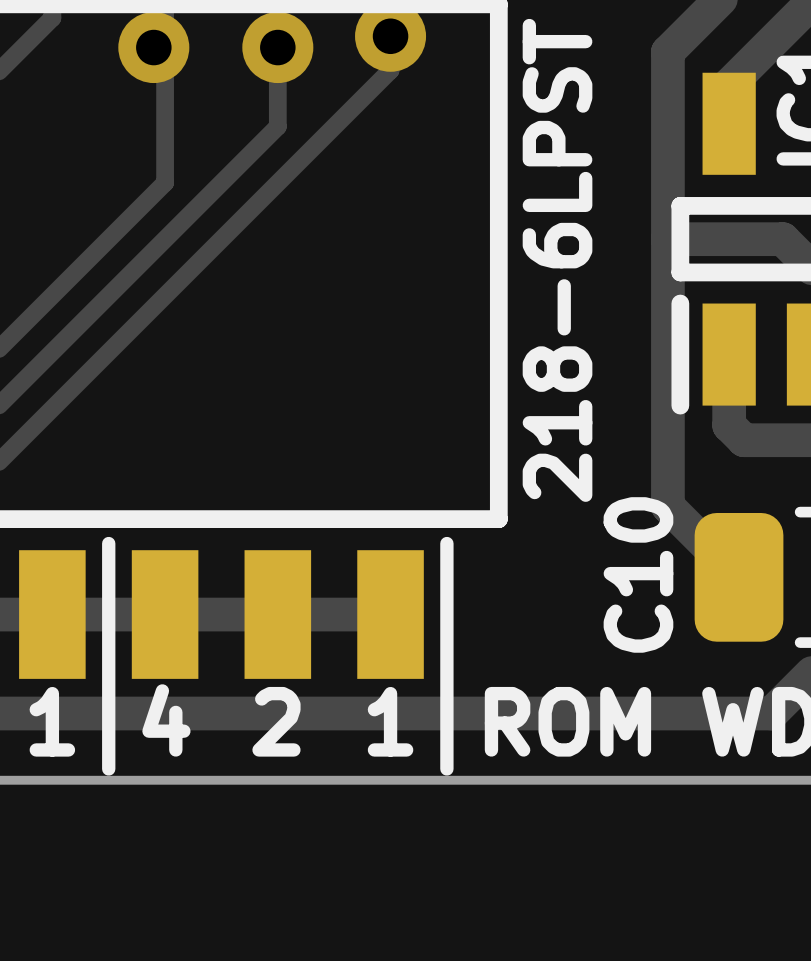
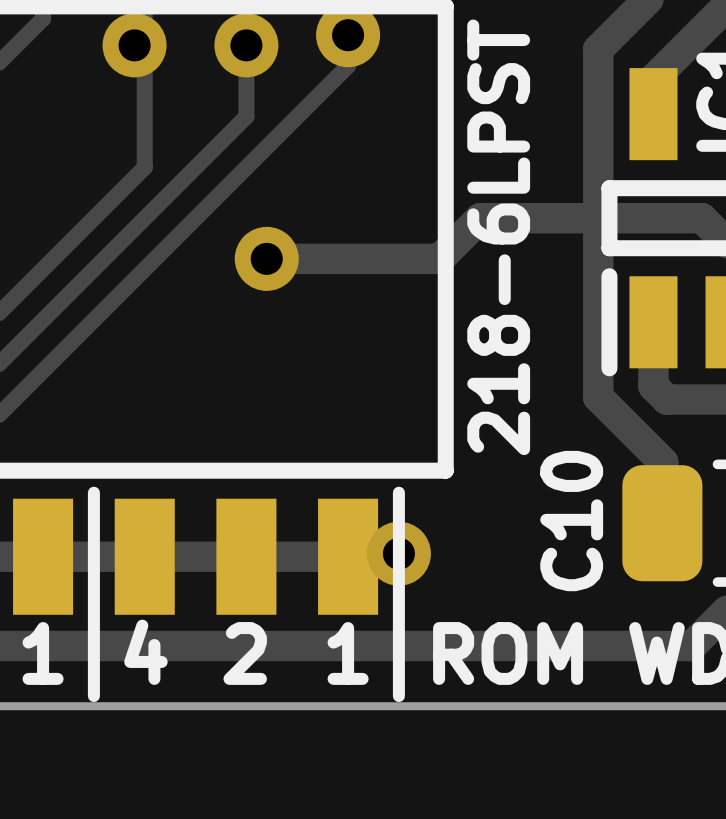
track: none -> (598, 218) (480, 218) (439, 258) (266, 258)
via: none -> (266, 258)
track: (667, 437) (667, 506) (739, 577) -> (598, 397) (663, 462)
via: none -> (398, 553)

